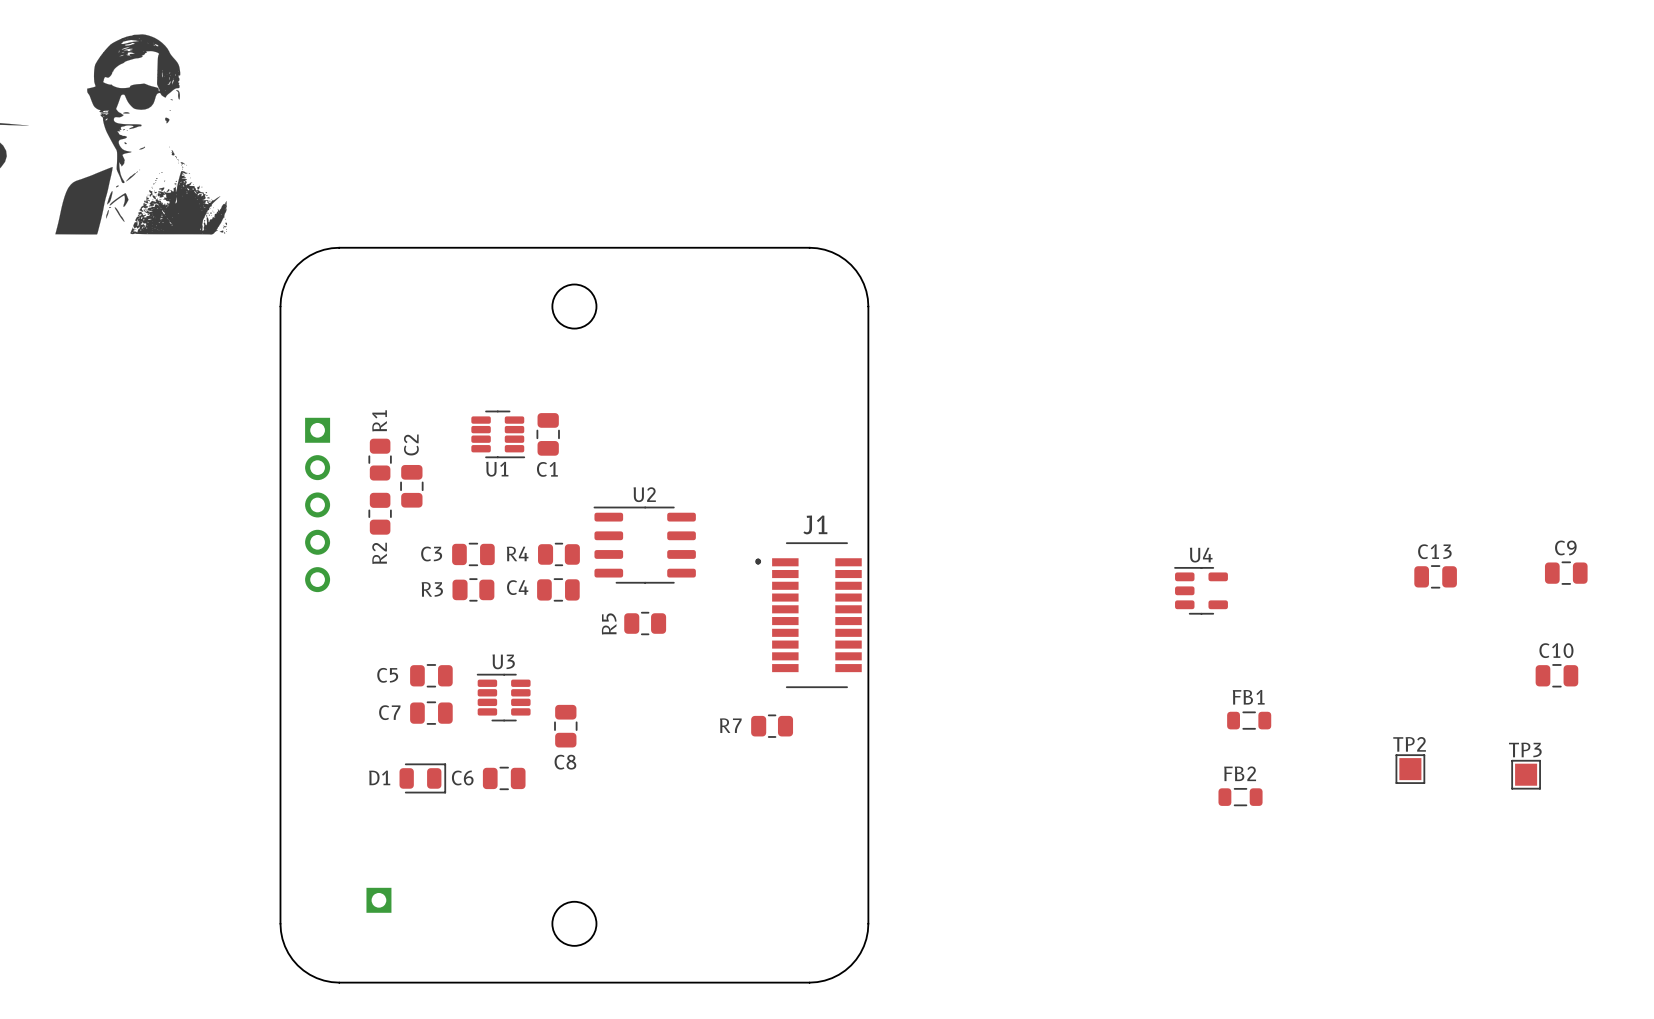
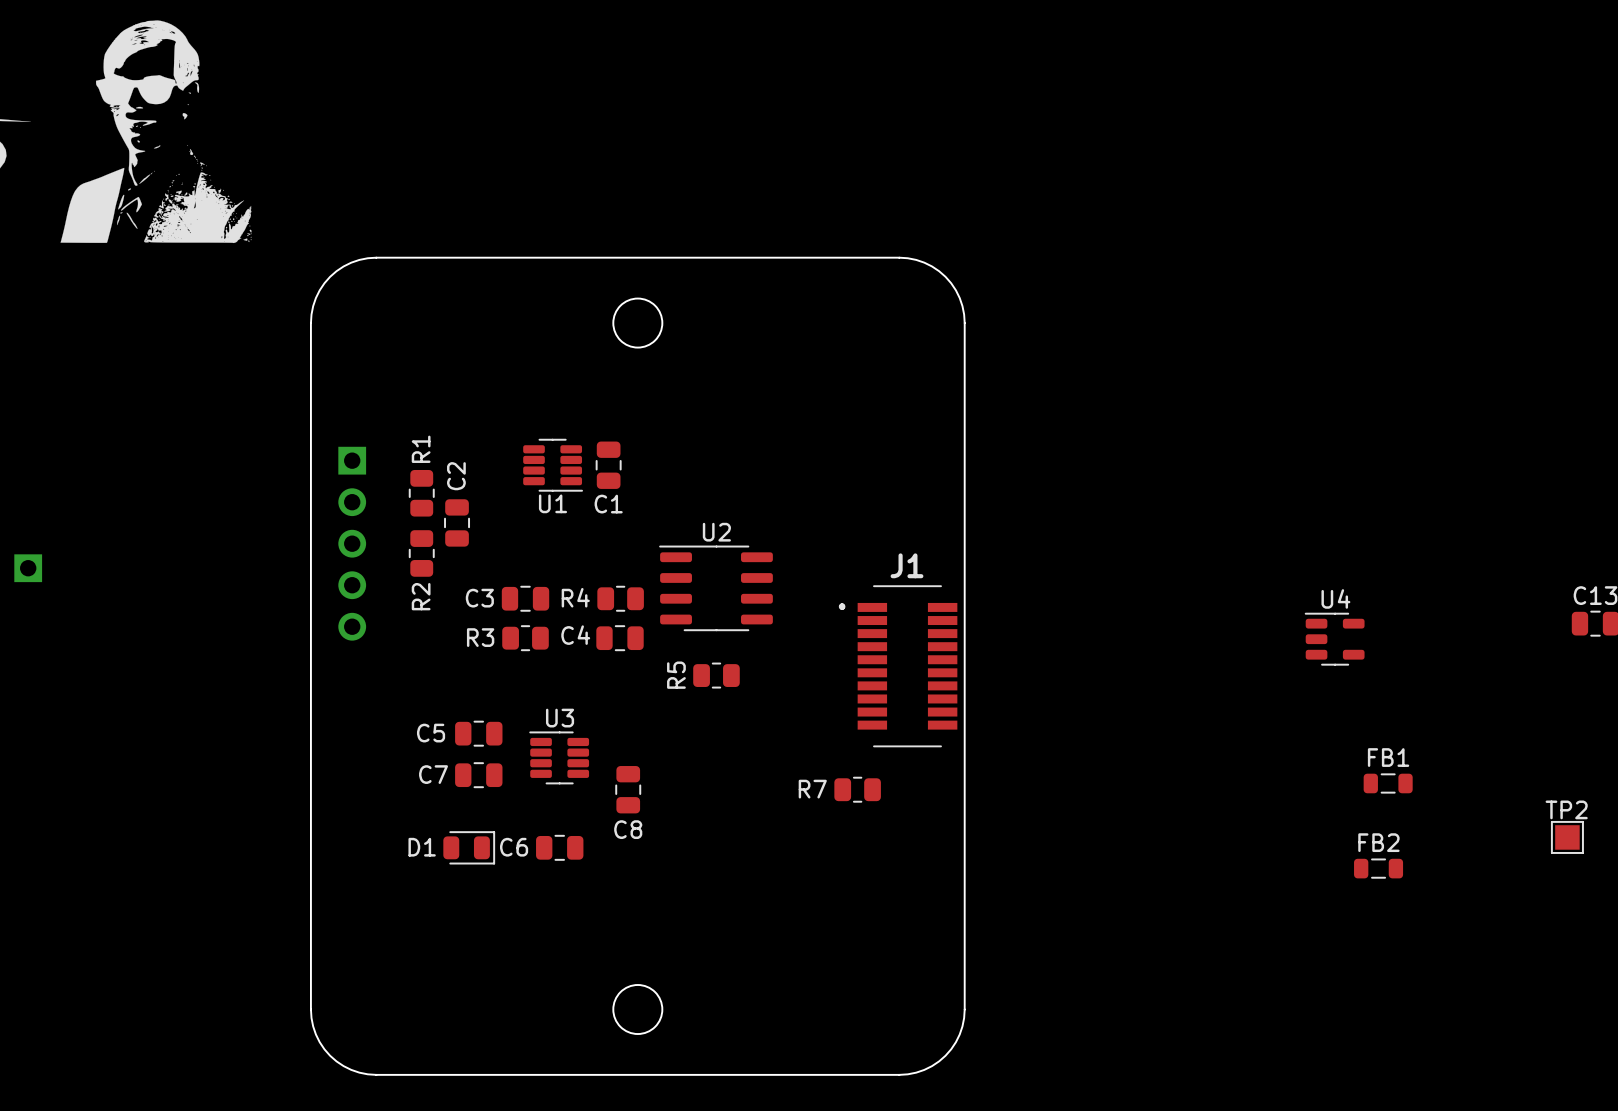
part: none -> (28, 568)
part: (378, 900) -> none

